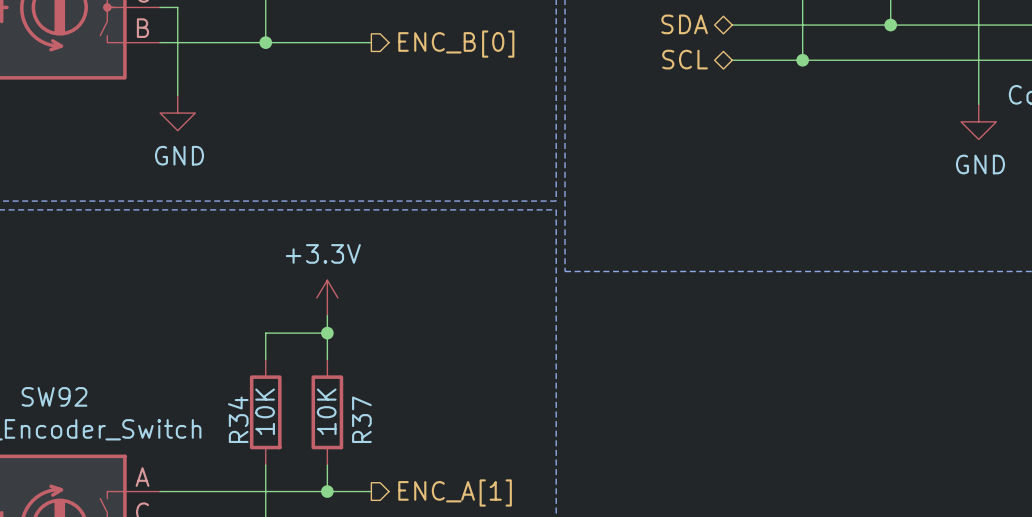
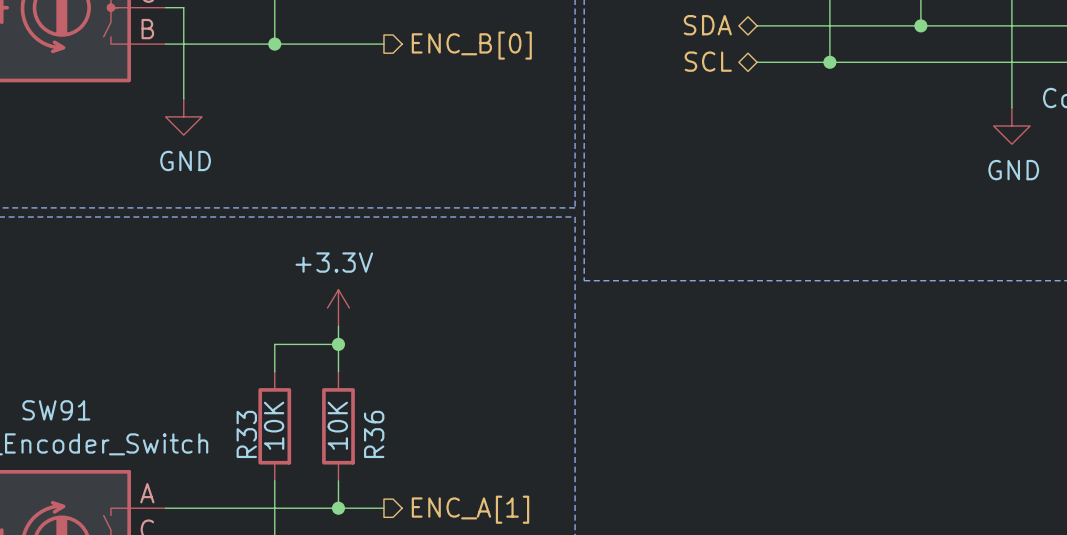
SW92 name: SW92 (54, 396) -> SW91 (56, 410)
R34 name: R34 (238, 419) -> R33 (246, 434)
R37 name: R37 (361, 419) -> R36 (374, 434)

